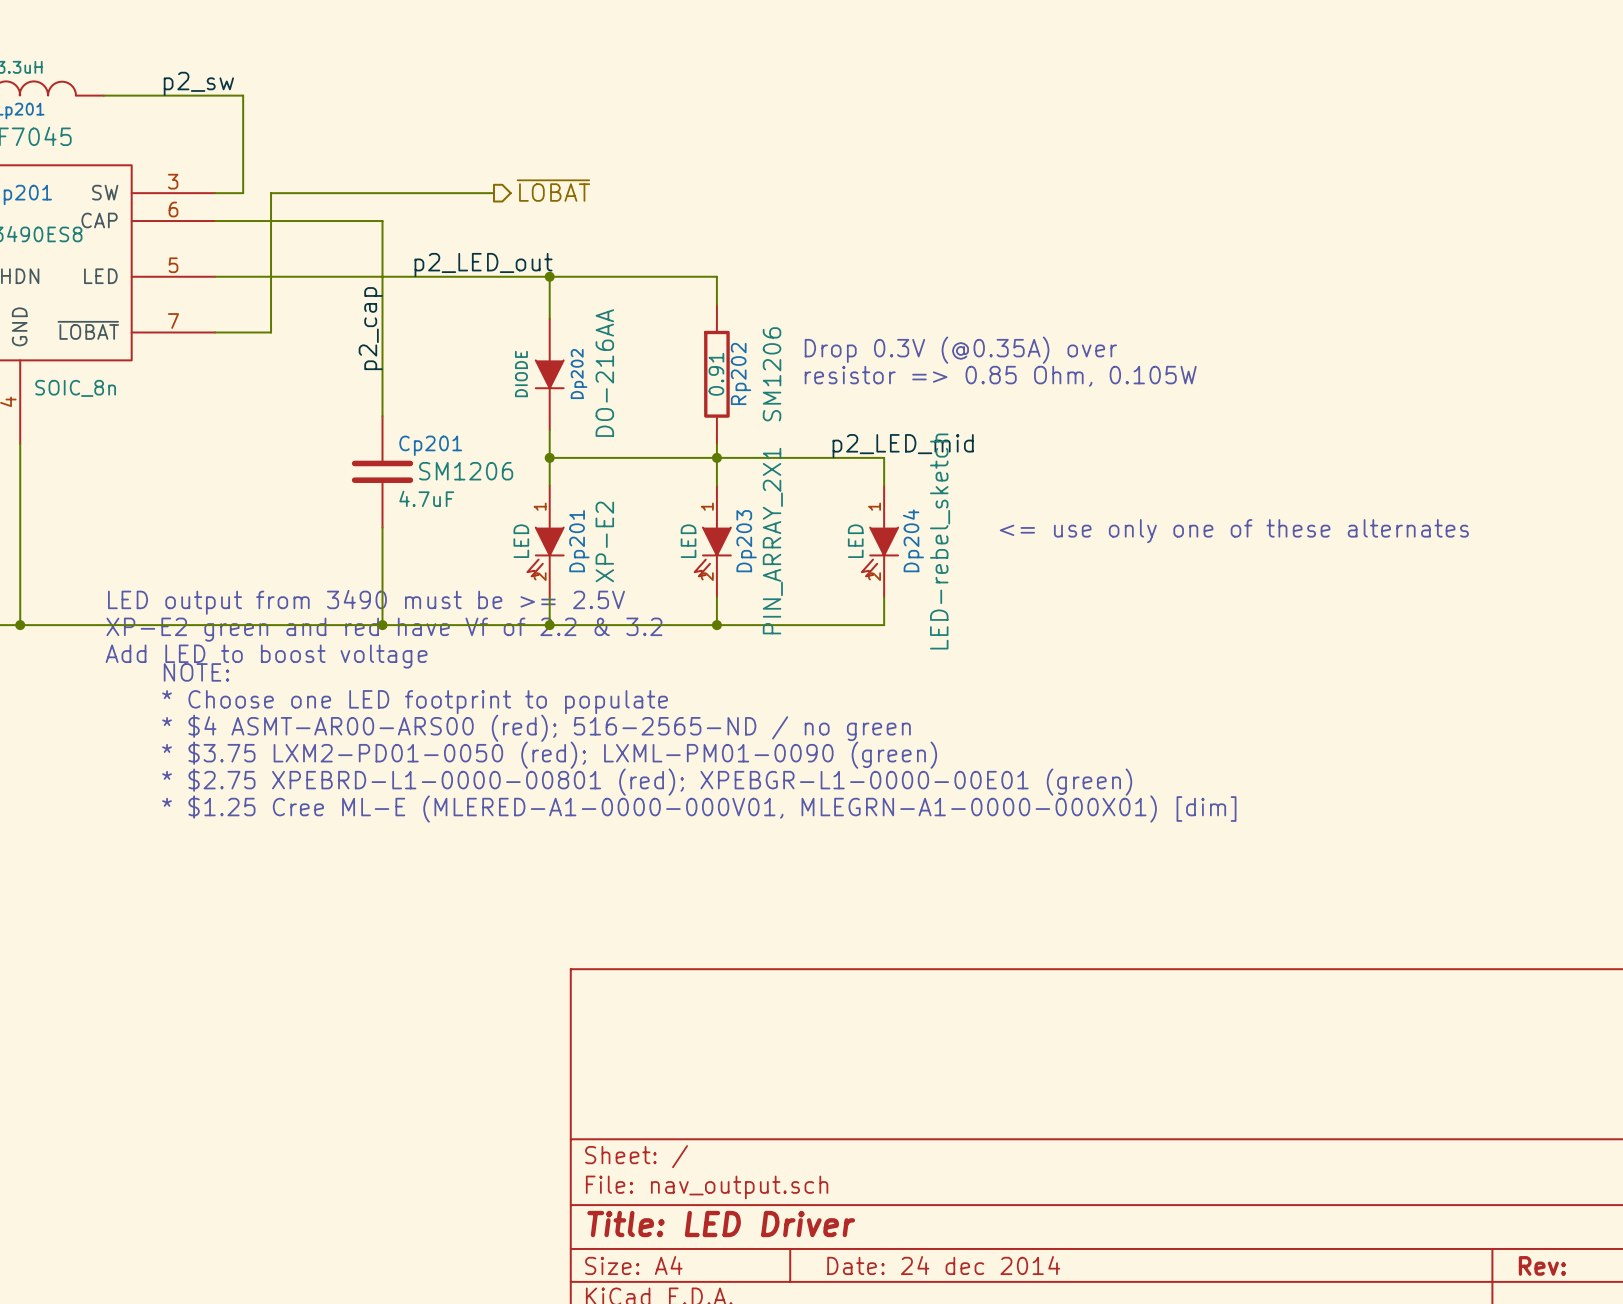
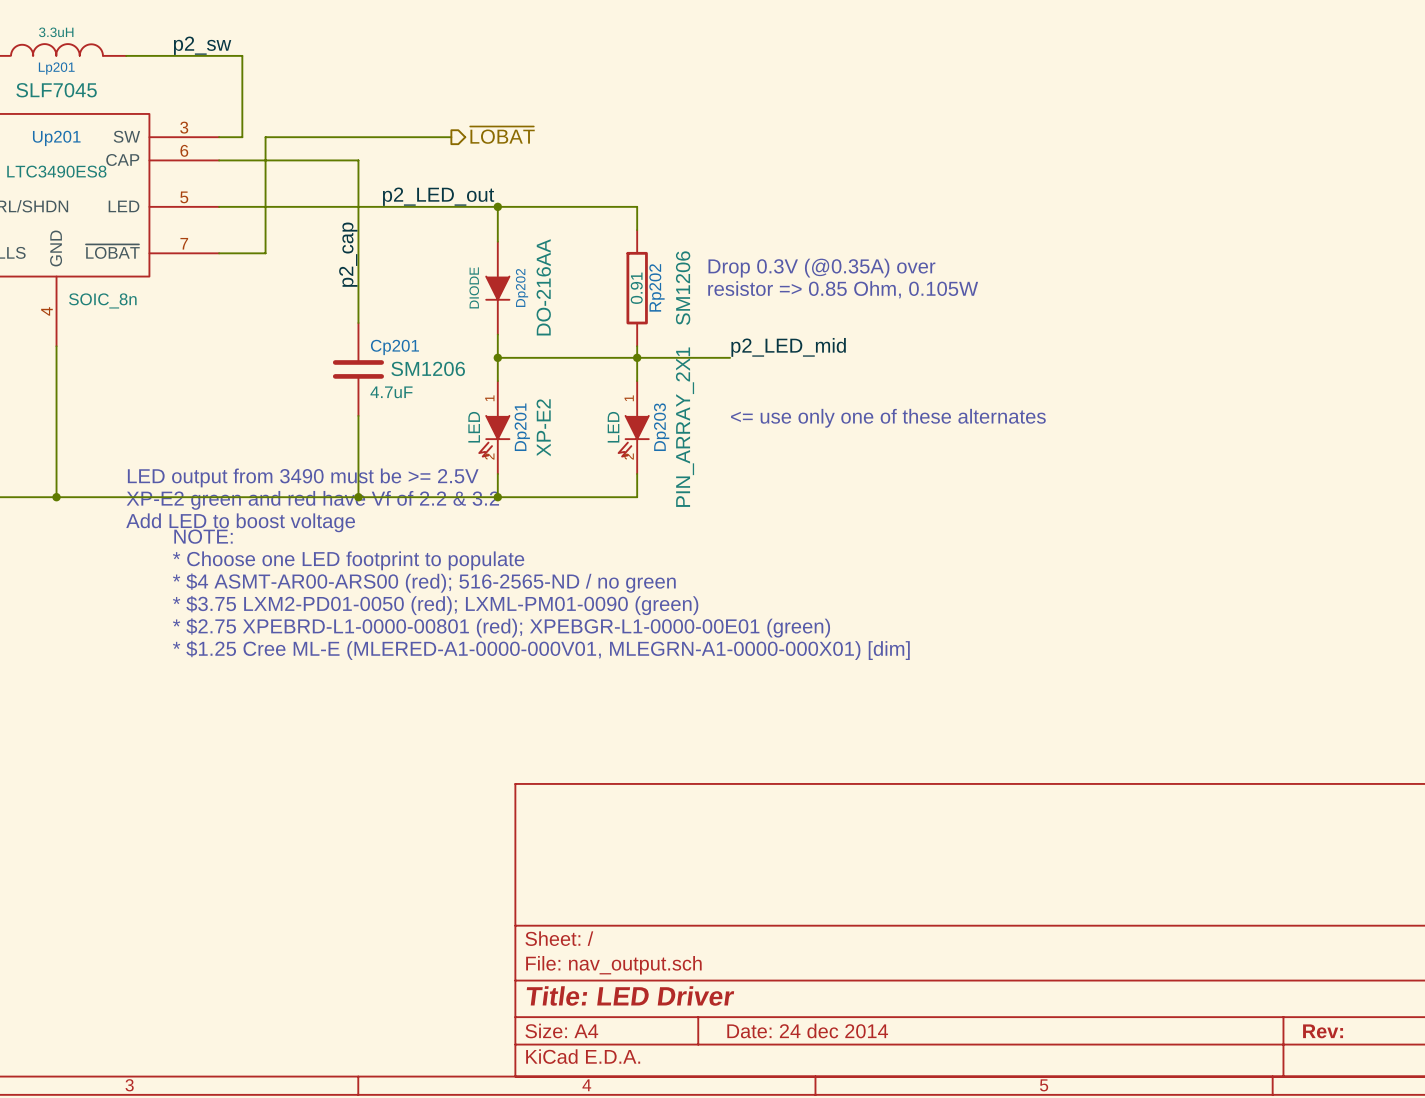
wire: (828, 457) (884, 457) (884, 485) -> none
text position: <= use only one of these alternates (1234, 531) -> <= use only one of these alternates (888, 418)
Dp204: LED (879, 541) -> none
wire: (884, 597) (884, 625) (716, 625) -> none
junction: (716, 625) -> none

